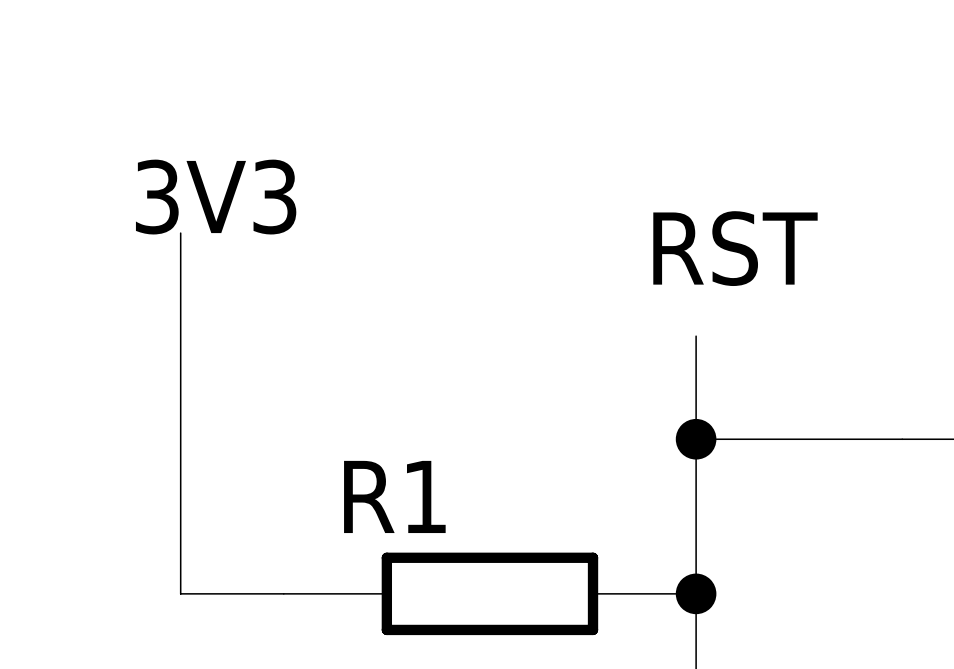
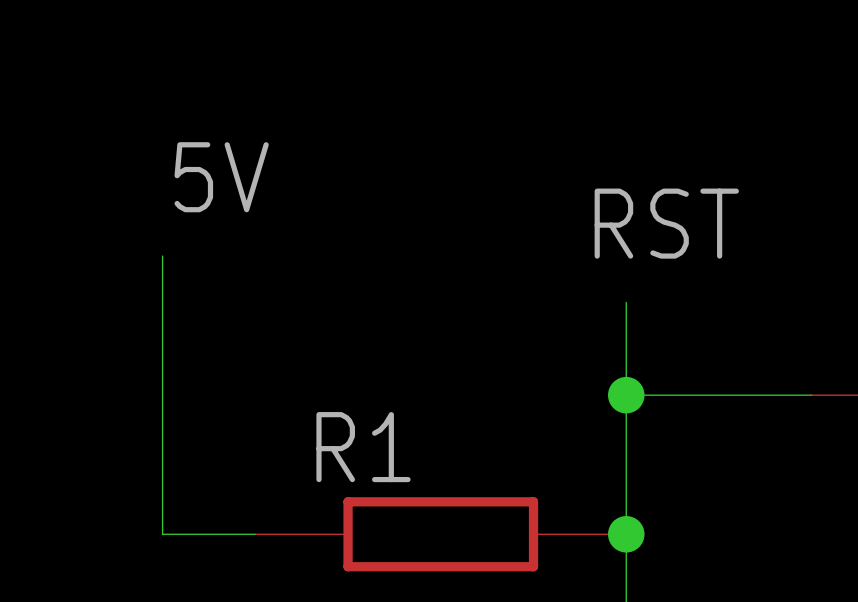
label: 3V3 (216, 197) -> none
label: none -> 5V (221, 177)
wire: (180, 233) (180, 284) -> none

